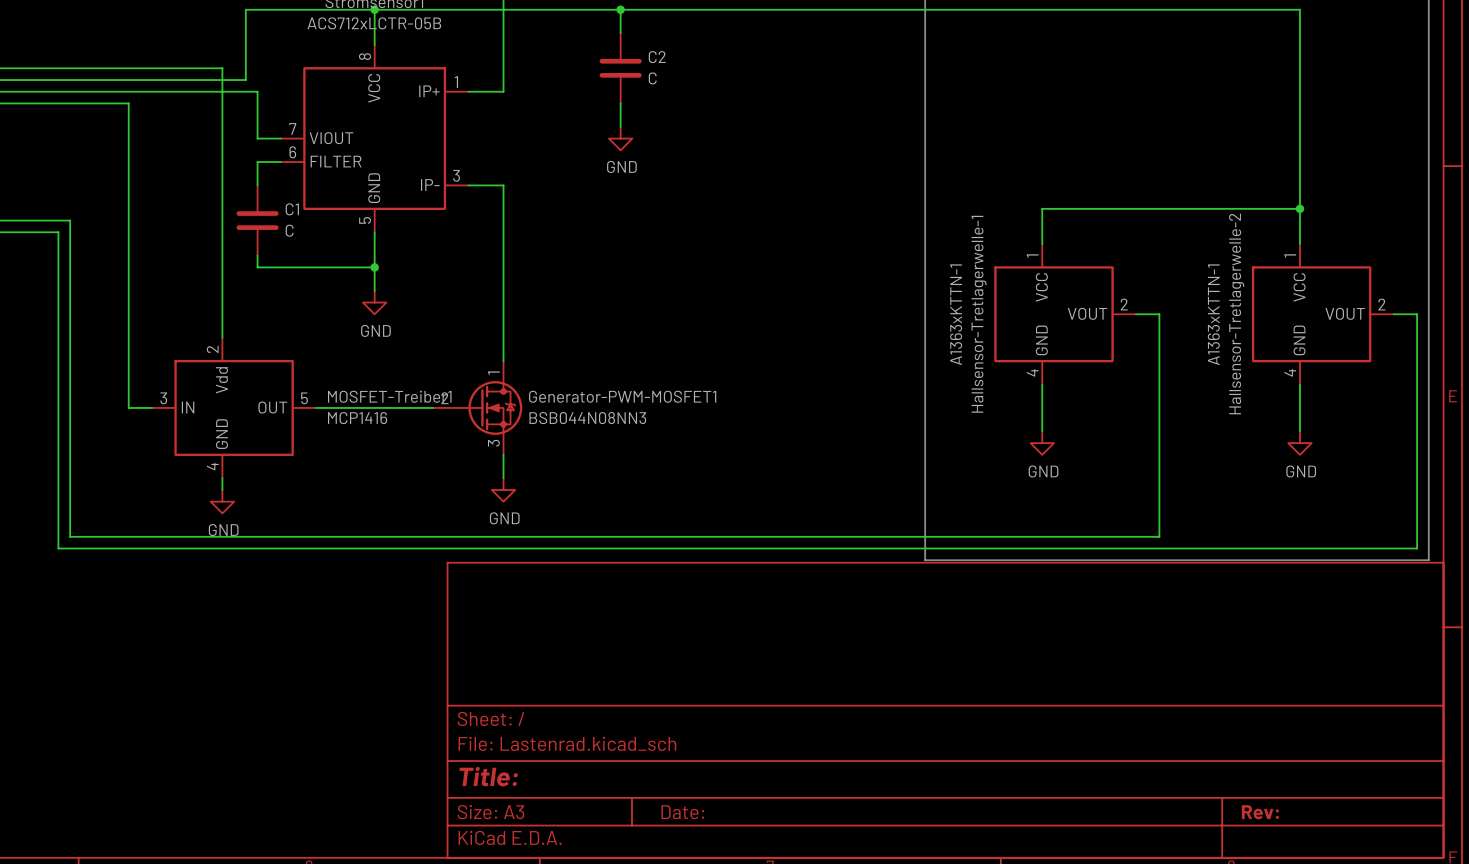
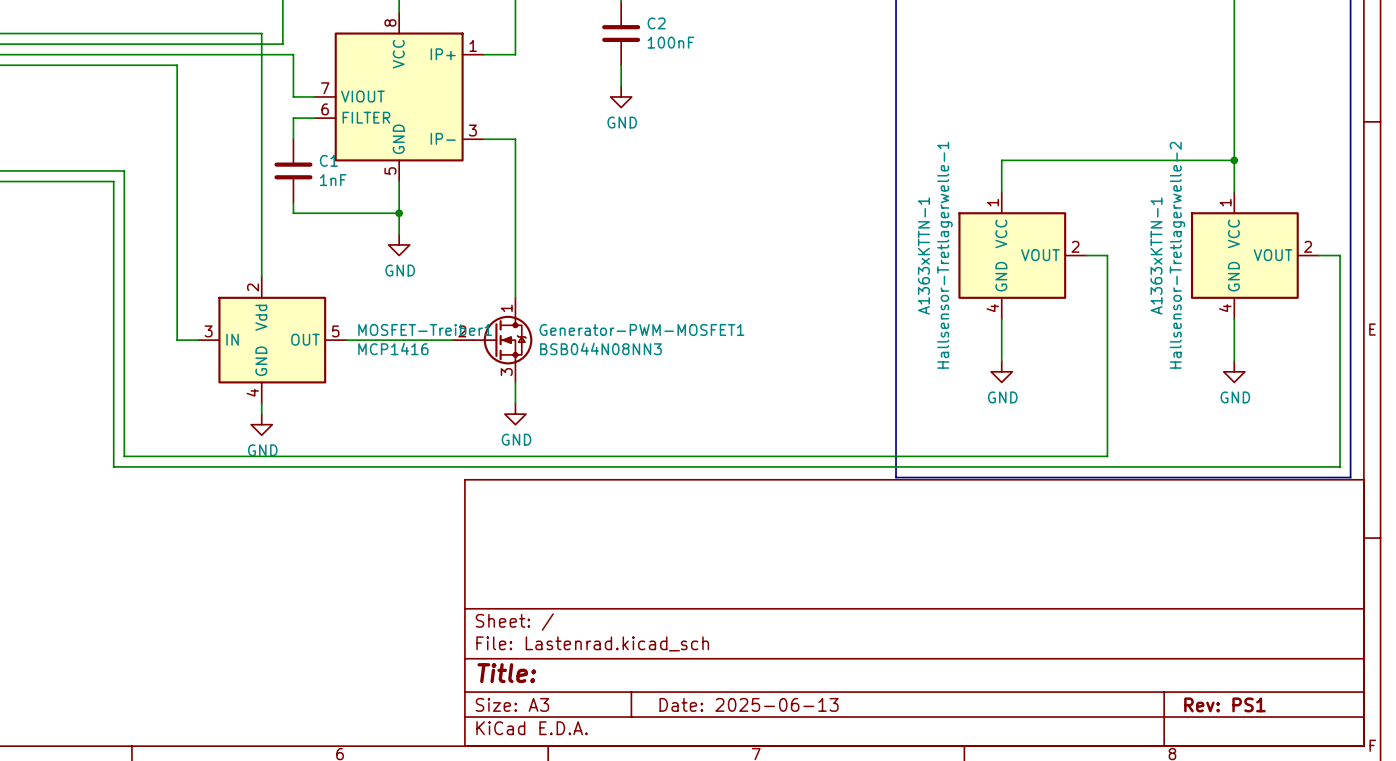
C2 value: C (652, 78) -> 100nF (670, 42)
C1 value: C (289, 230) -> 1nF (333, 180)
title block: Date: (682, 812) -> Date: 2025-06-13 (749, 704)
title block: Rev: (1260, 812) -> Rev: PS1 (1224, 704)

